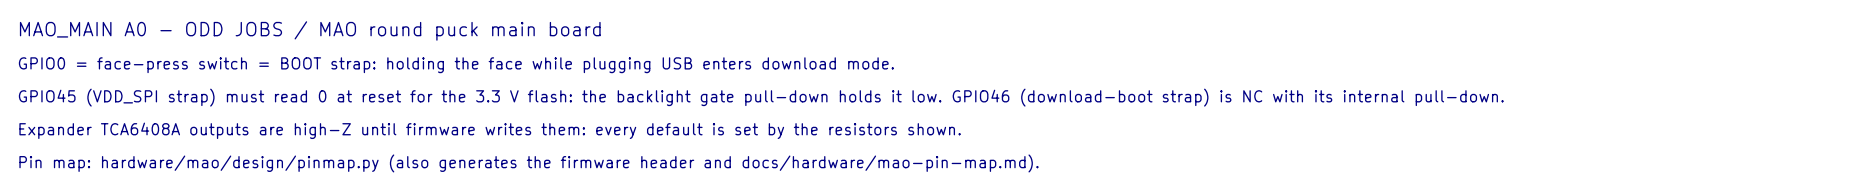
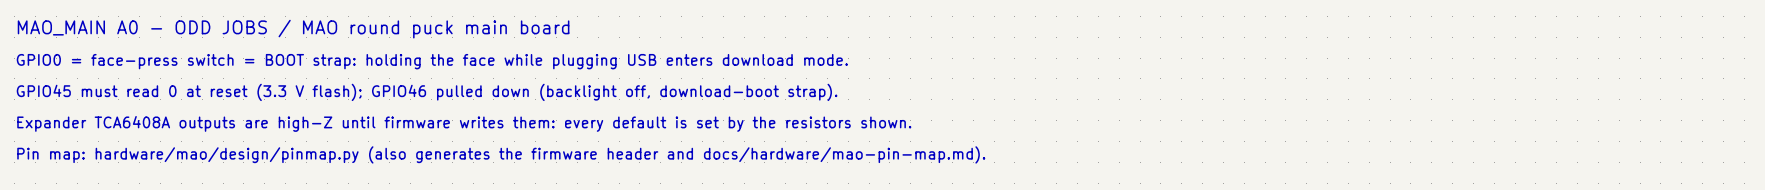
text: GPIO45 (VDD_SPI strap) must read 0 at reset for the 3.3 V flash: the backlight gate pull-down holds it low. GPIO46 (download-boot strap) is NC with its internal pull-down. (761, 97) -> GPIO45 must read 0 at reset (3.3 V flash); GPIO46 pulled down (backlight off, download-boot strap). (427, 92)

